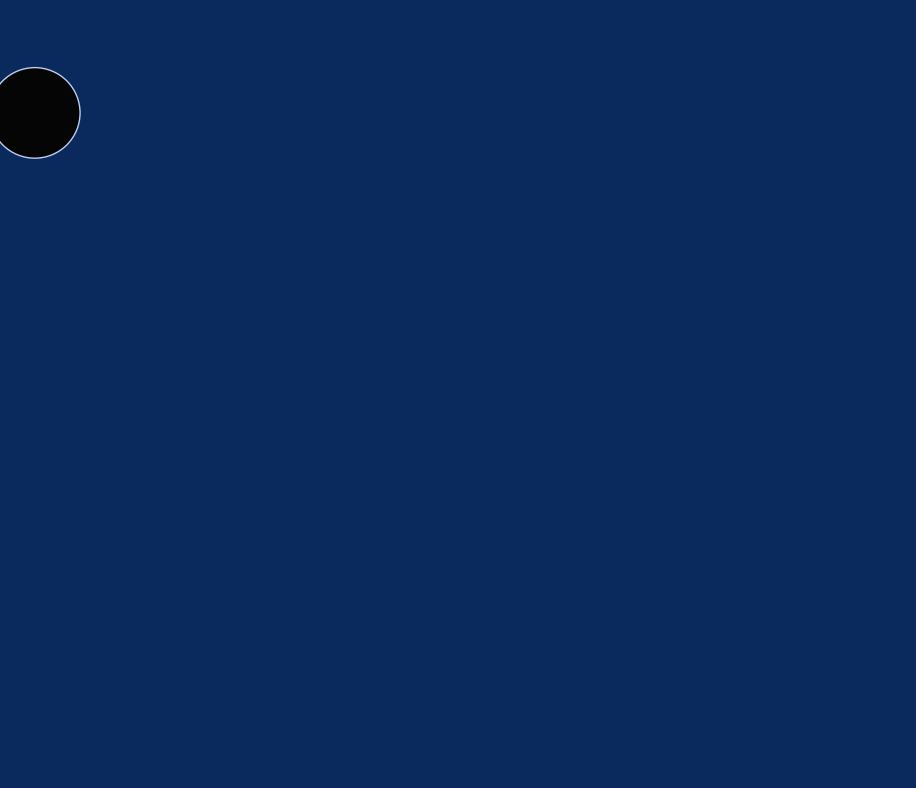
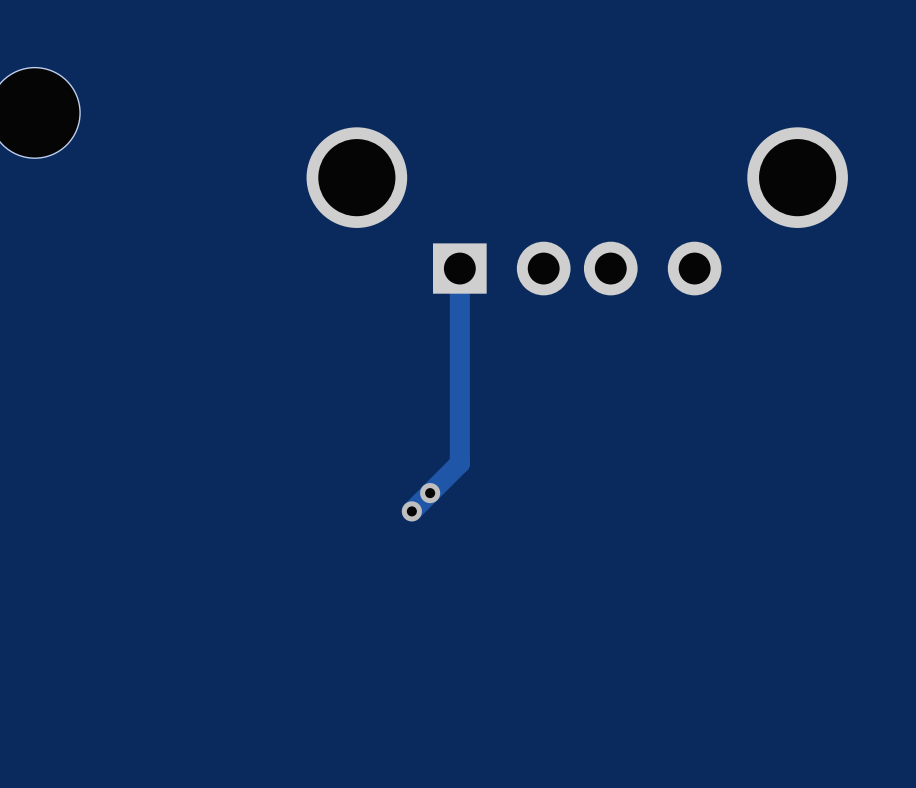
part: none -> (577, 211)
track: none -> (459, 268) (459, 463) (411, 511)
via: none -> (430, 493)
via: none -> (411, 511)

